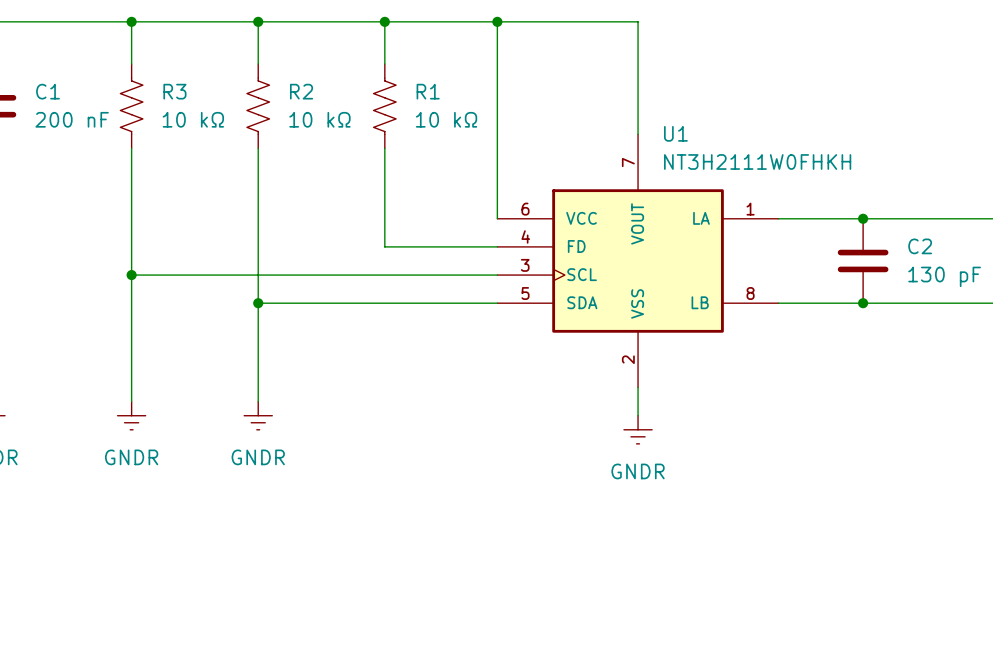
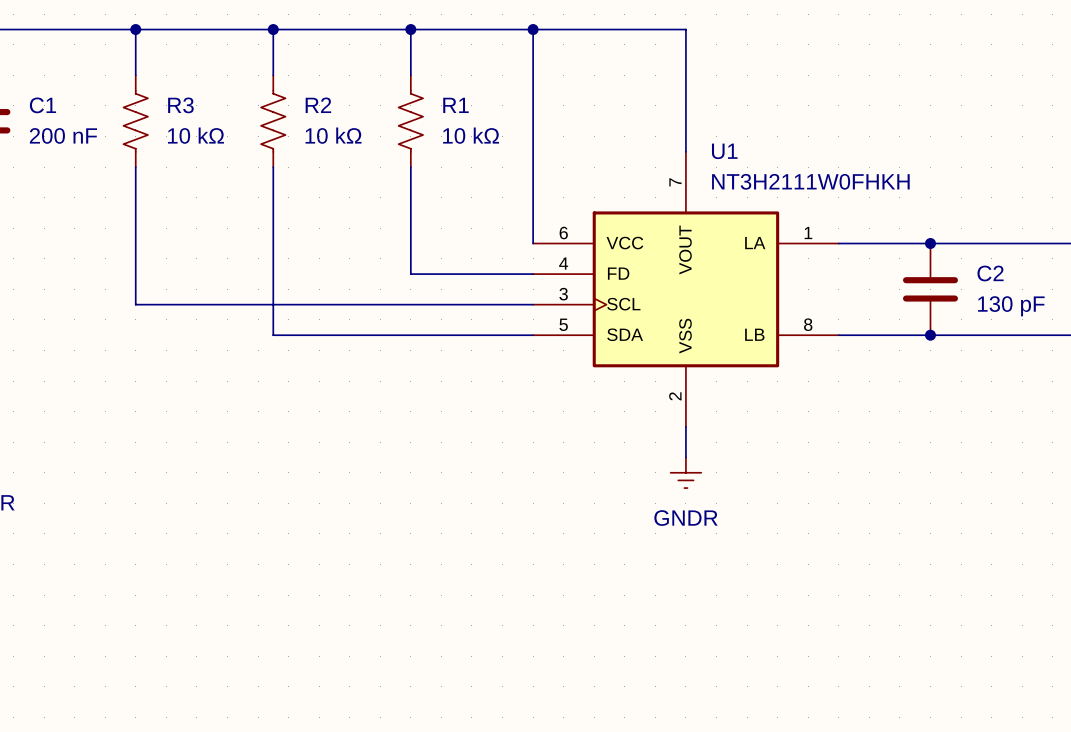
wire: (131, 275) (131, 401) -> none
junction: (131, 275) -> none
wire: (258, 303) (258, 401) -> none
junction: (258, 303) -> none
power symbol: GNDR (131, 415) -> none
power symbol: GNDR (258, 415) -> none

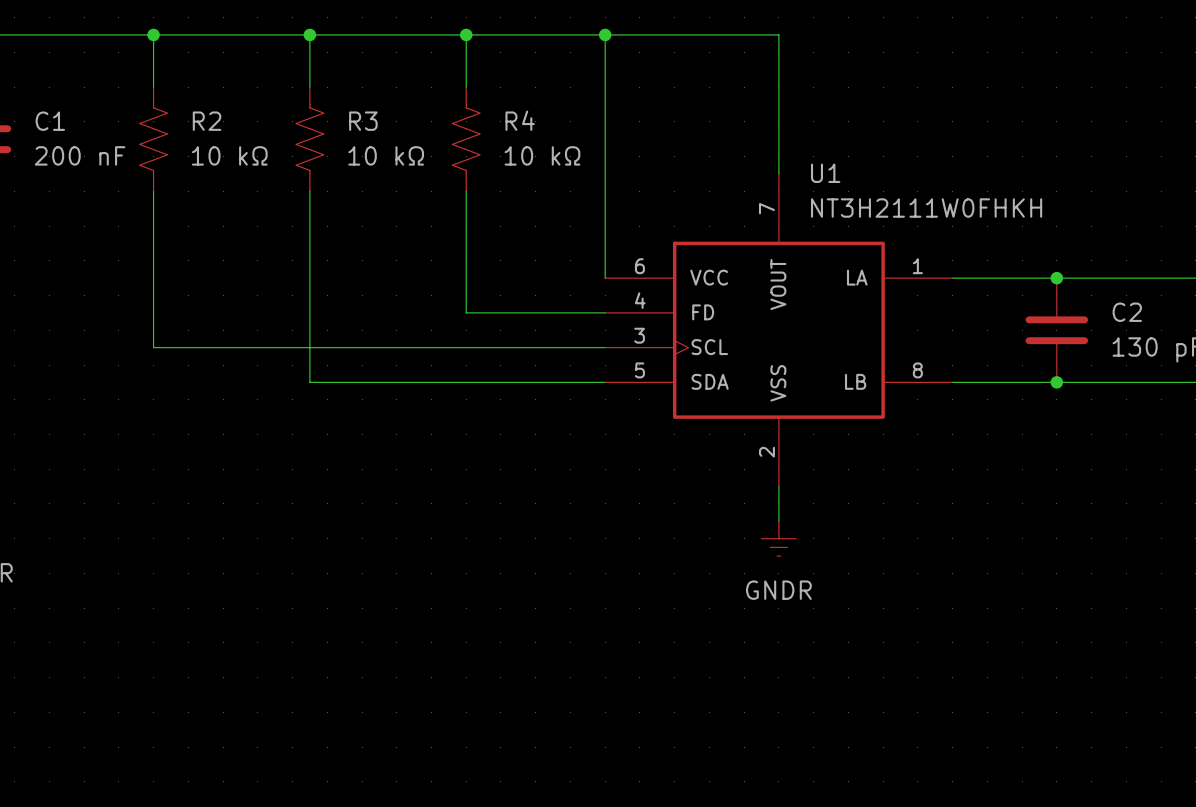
R3 name: R3 (180, 105) -> R2 (207, 121)
R2 name: R2 (318, 105) -> R3 (363, 121)
R1 name: R1 (455, 105) -> R4 (520, 120)

